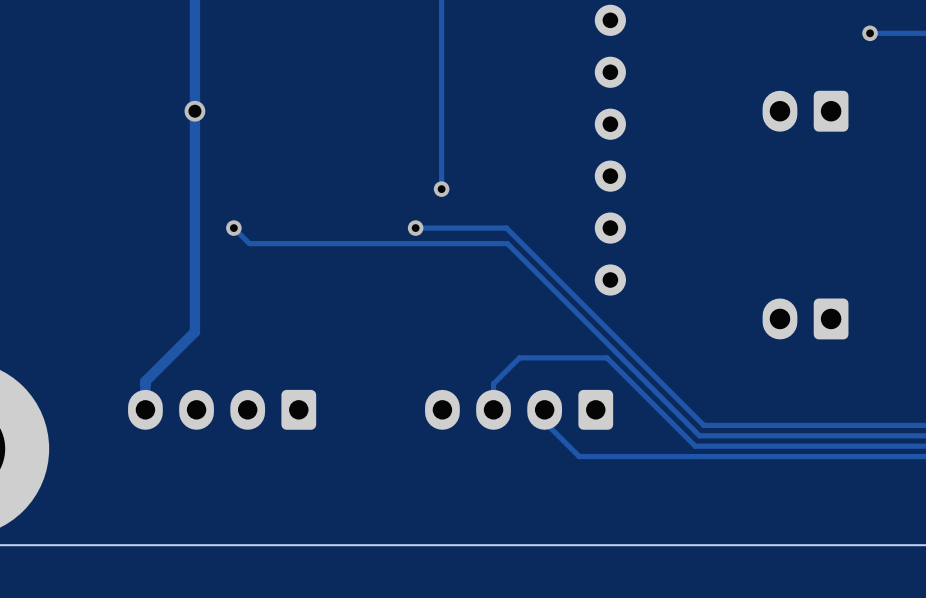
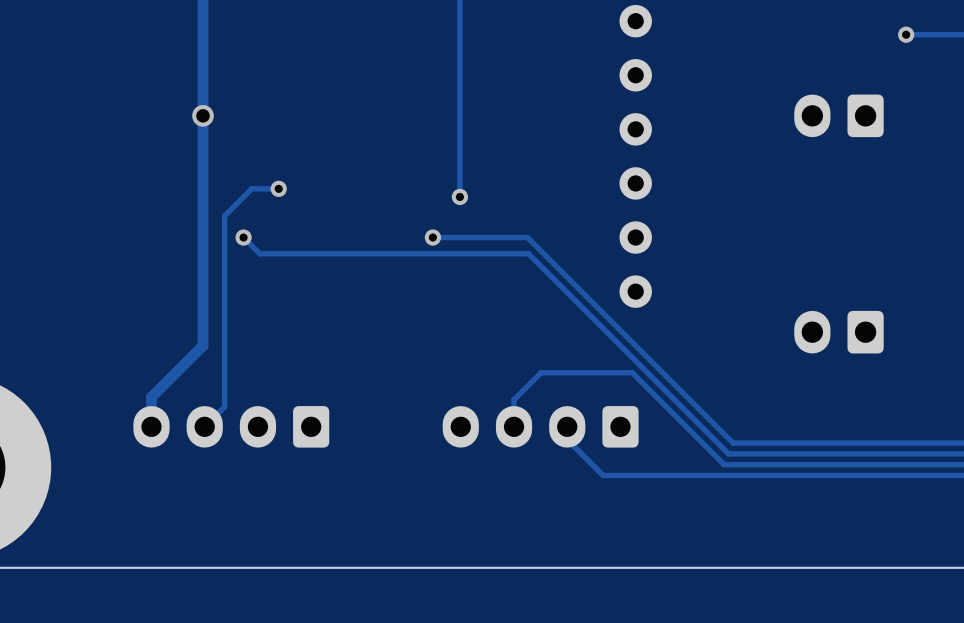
track: none -> (278, 188) (251, 188) (224, 215) (224, 406) (204, 426)
via: none -> (278, 188)

